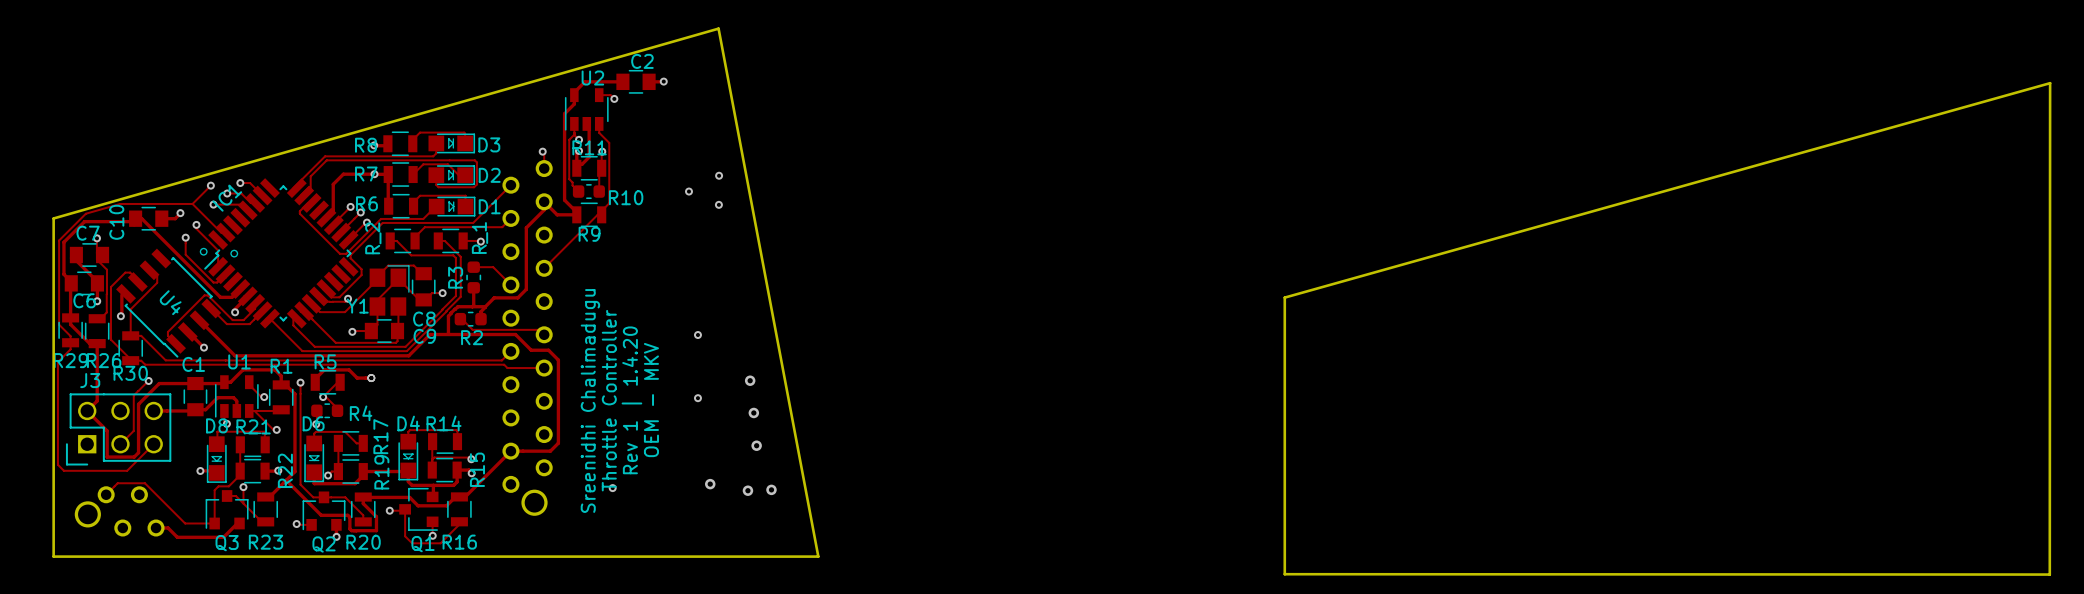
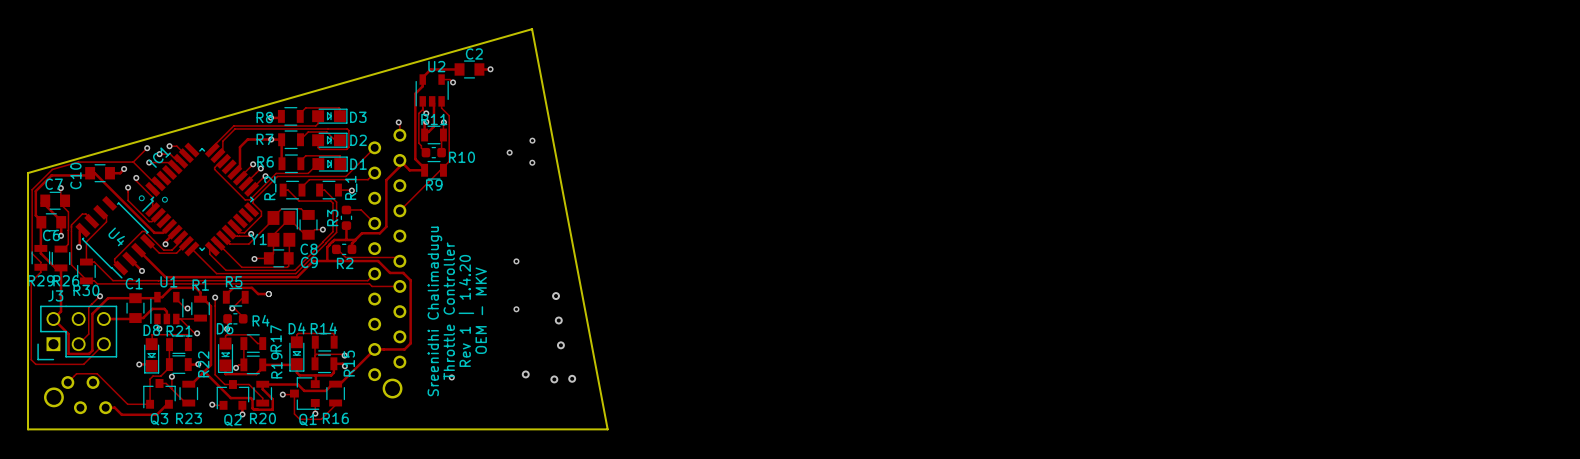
board edge: (2050, 83) (1284, 297) (1284, 574) (2049, 574) (2050, 83) -> none

